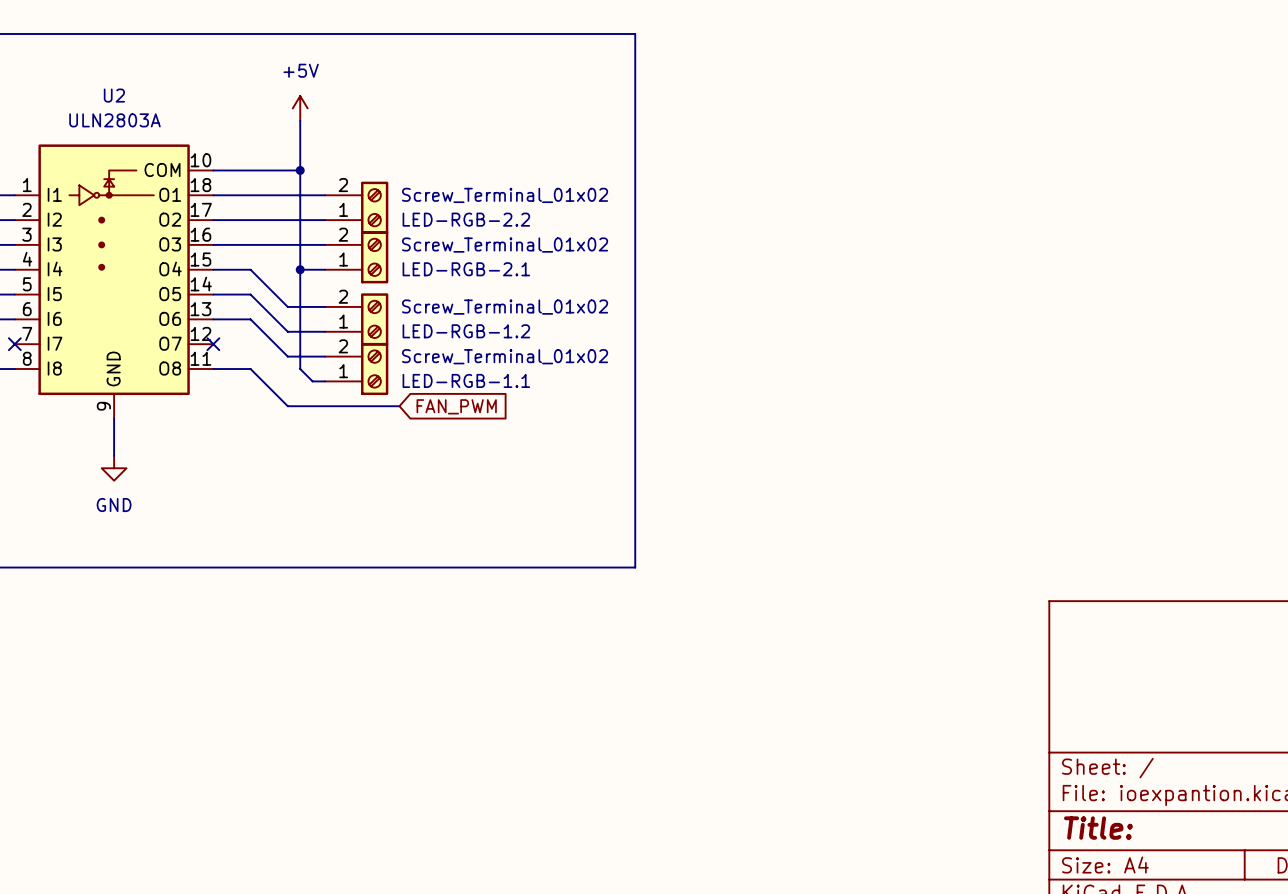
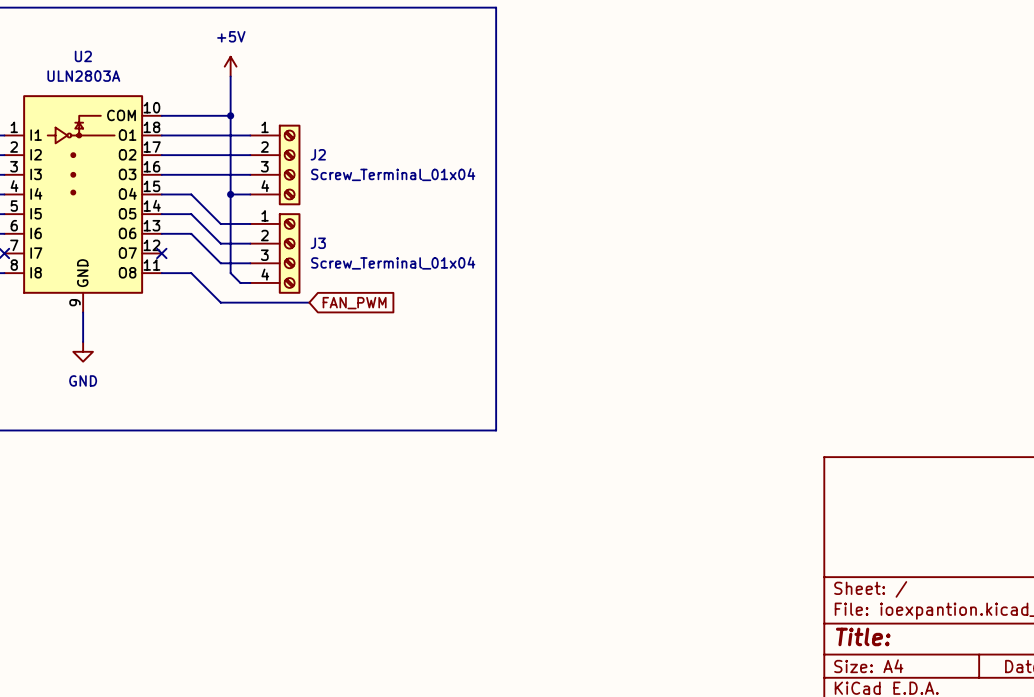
LED-RGB-2.2: Screw_Terminal_01x02 (356, 207) -> none
J2: none -> Screw_Terminal_01x04 (275, 164)
LED-RGB-2.1: Screw_Terminal_01x02 (356, 257) -> none
LED-RGB-1.2: Screw_Terminal_01x02 (356, 319) -> none
J3: none -> Screw_Terminal_01x04 (275, 253)
LED-RGB-1.1: Screw_Terminal_01x02 (356, 369) -> none

